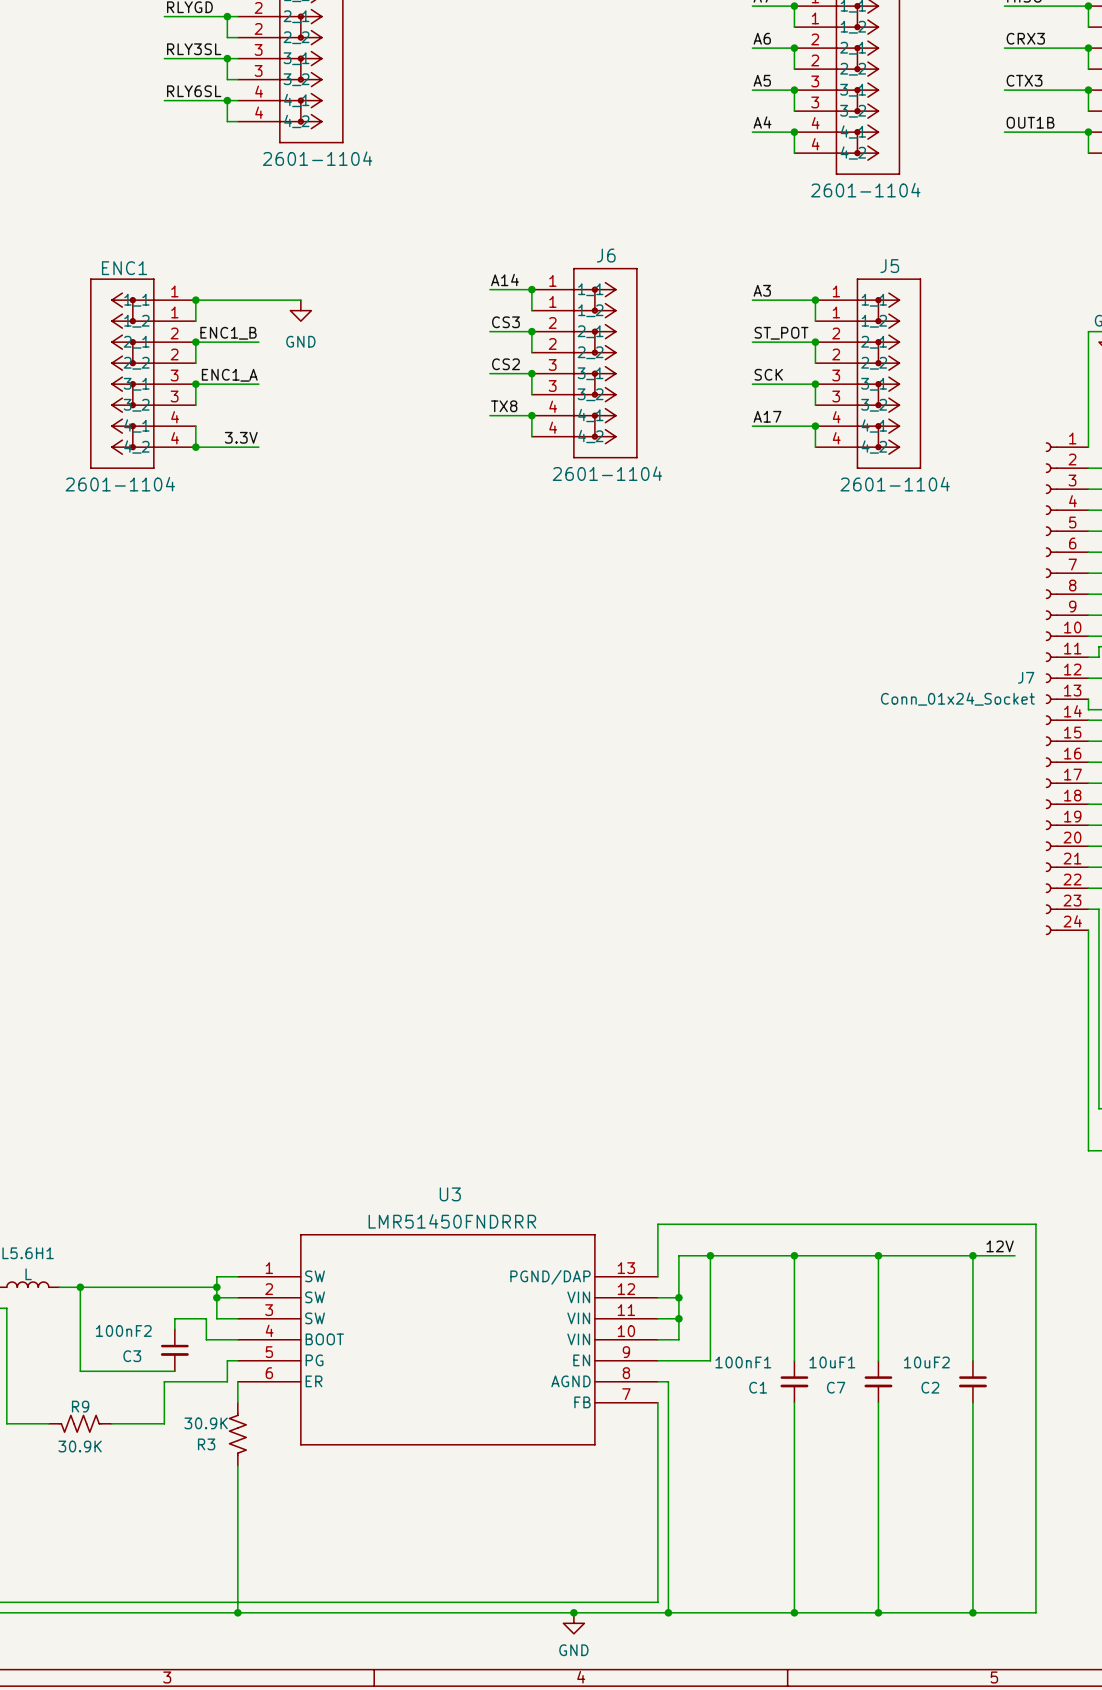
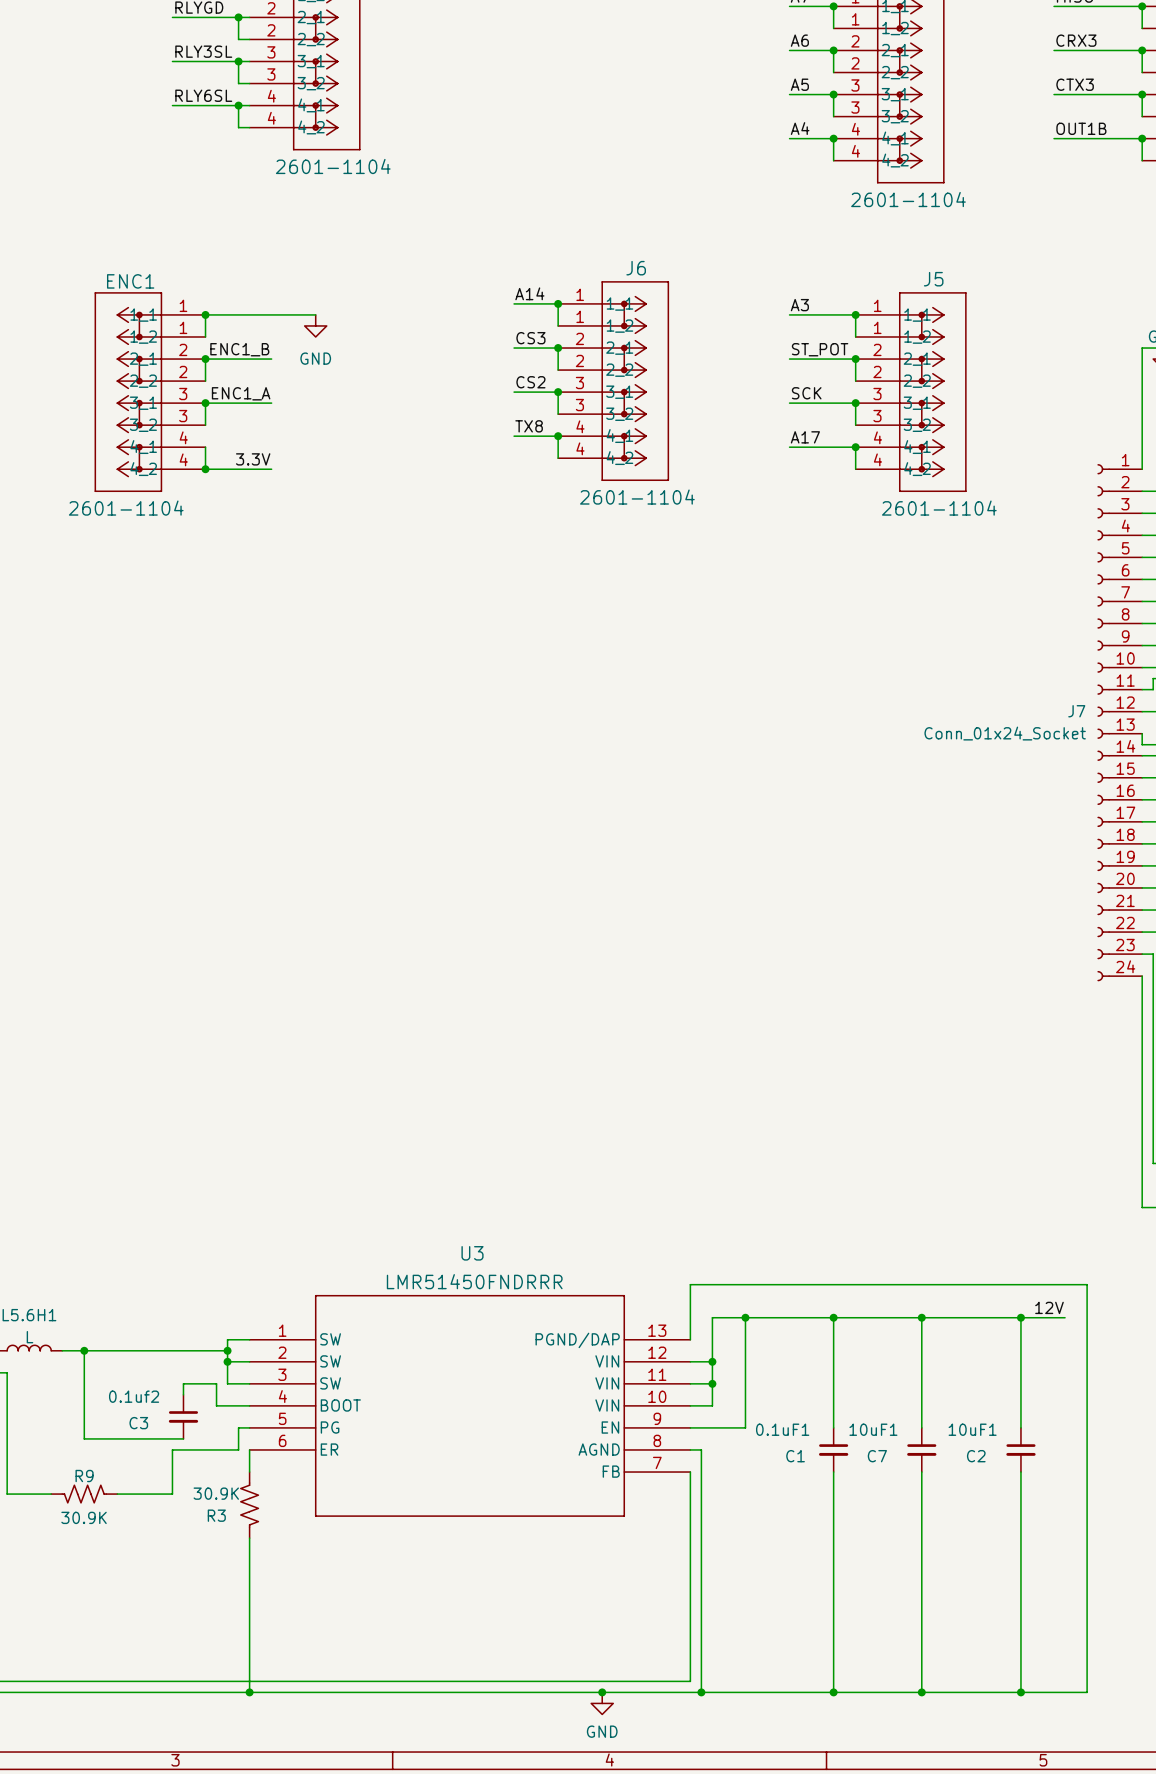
C3 value: 100nF2 (123, 1330) -> 0.1uf2 (134, 1396)
C1 value: 100nF1 (743, 1362) -> 0.1uF1 (782, 1429)
C2 value: 10uF2 (926, 1362) -> 10uF1 (972, 1429)

